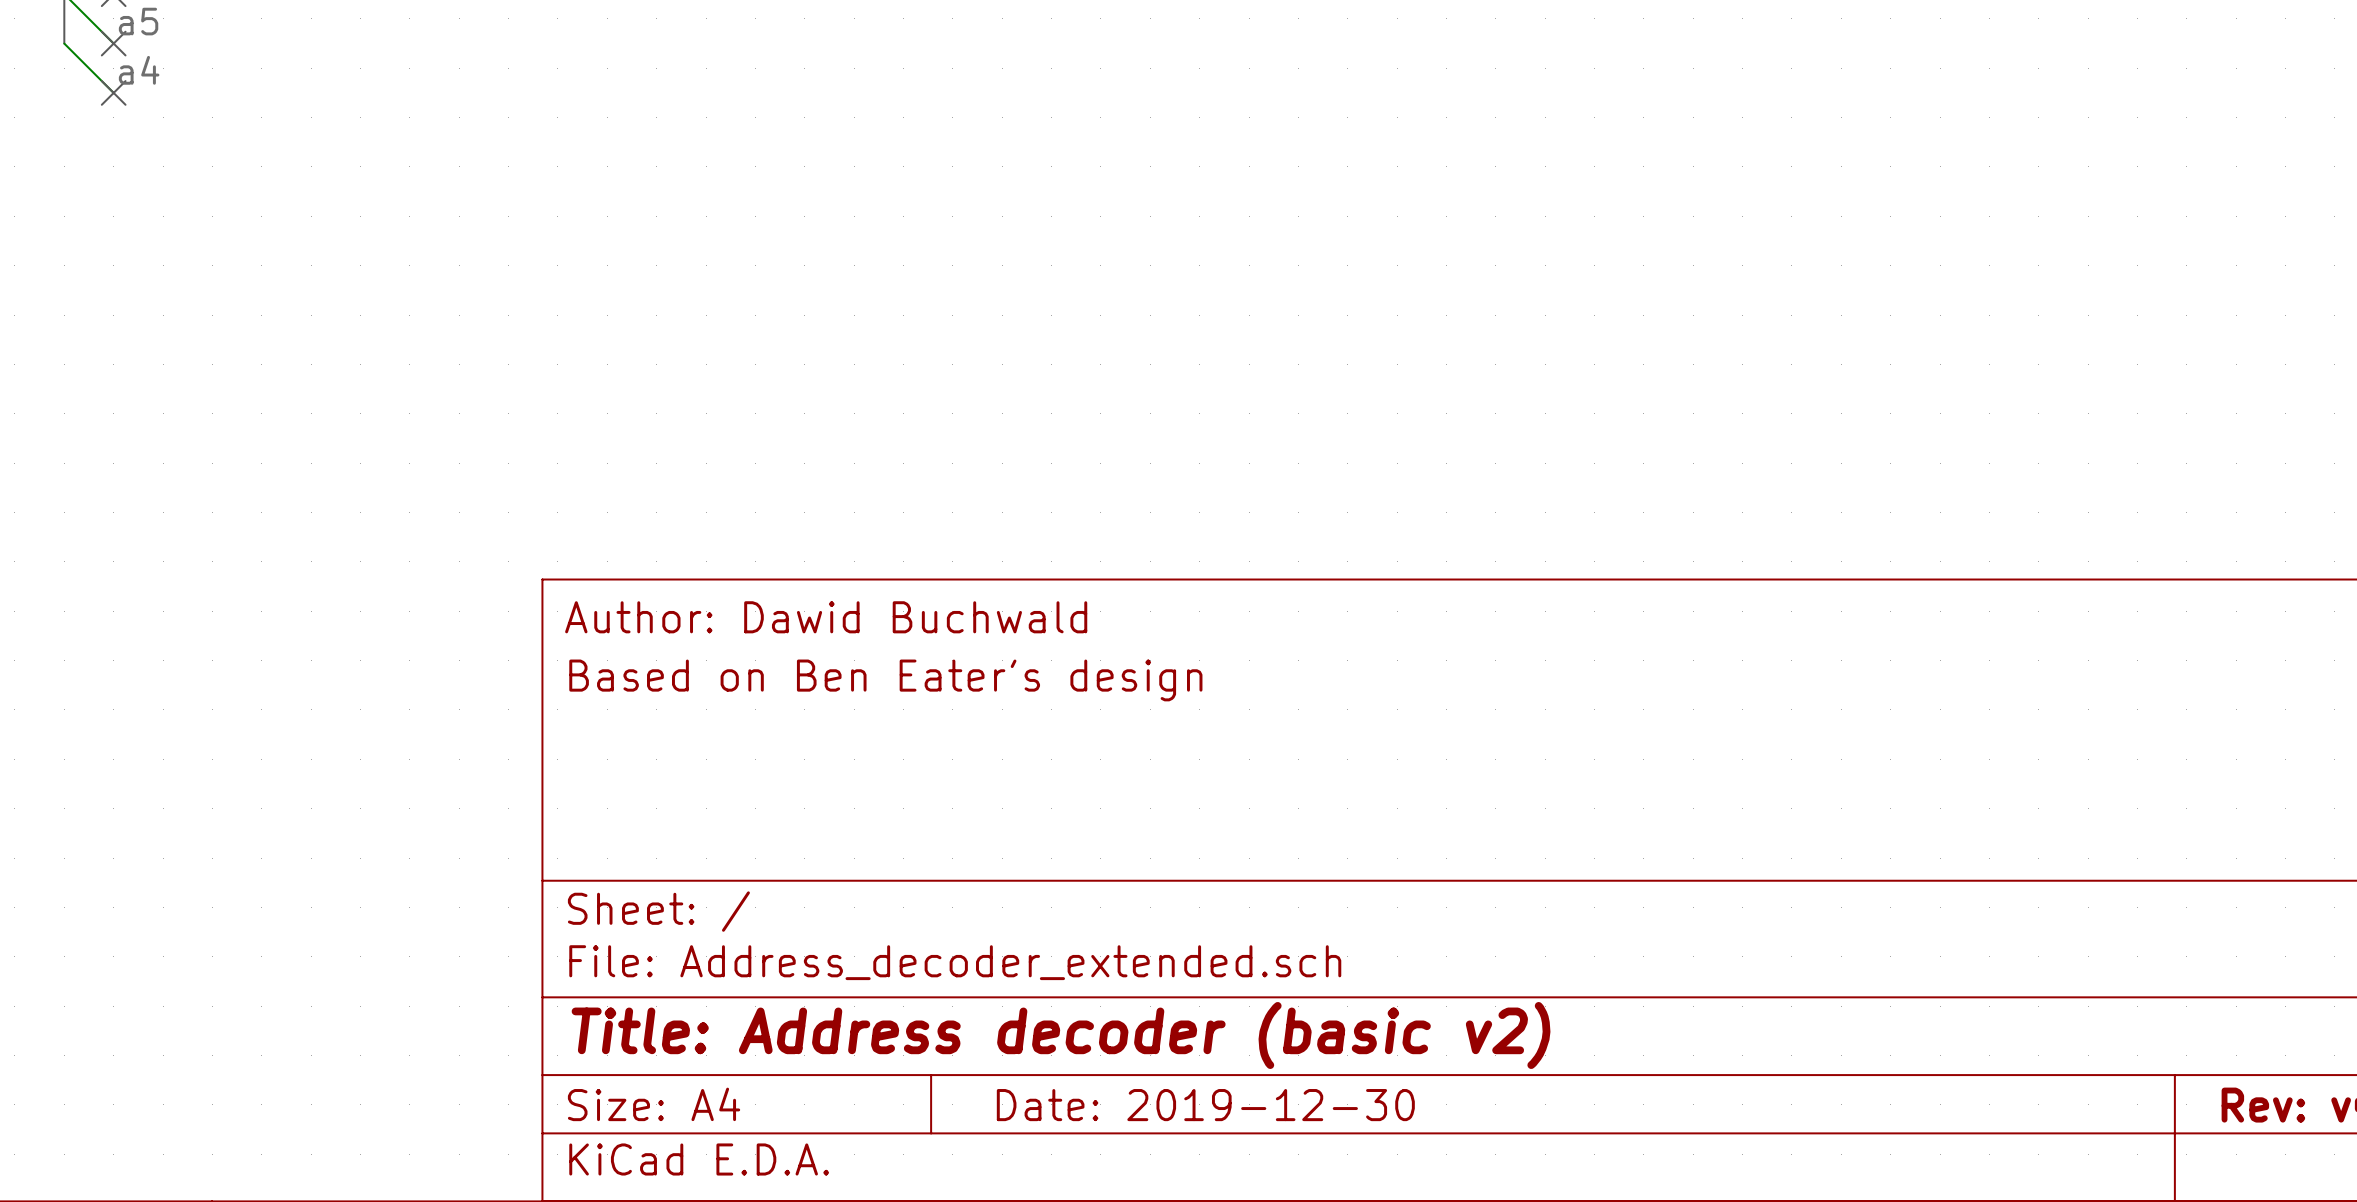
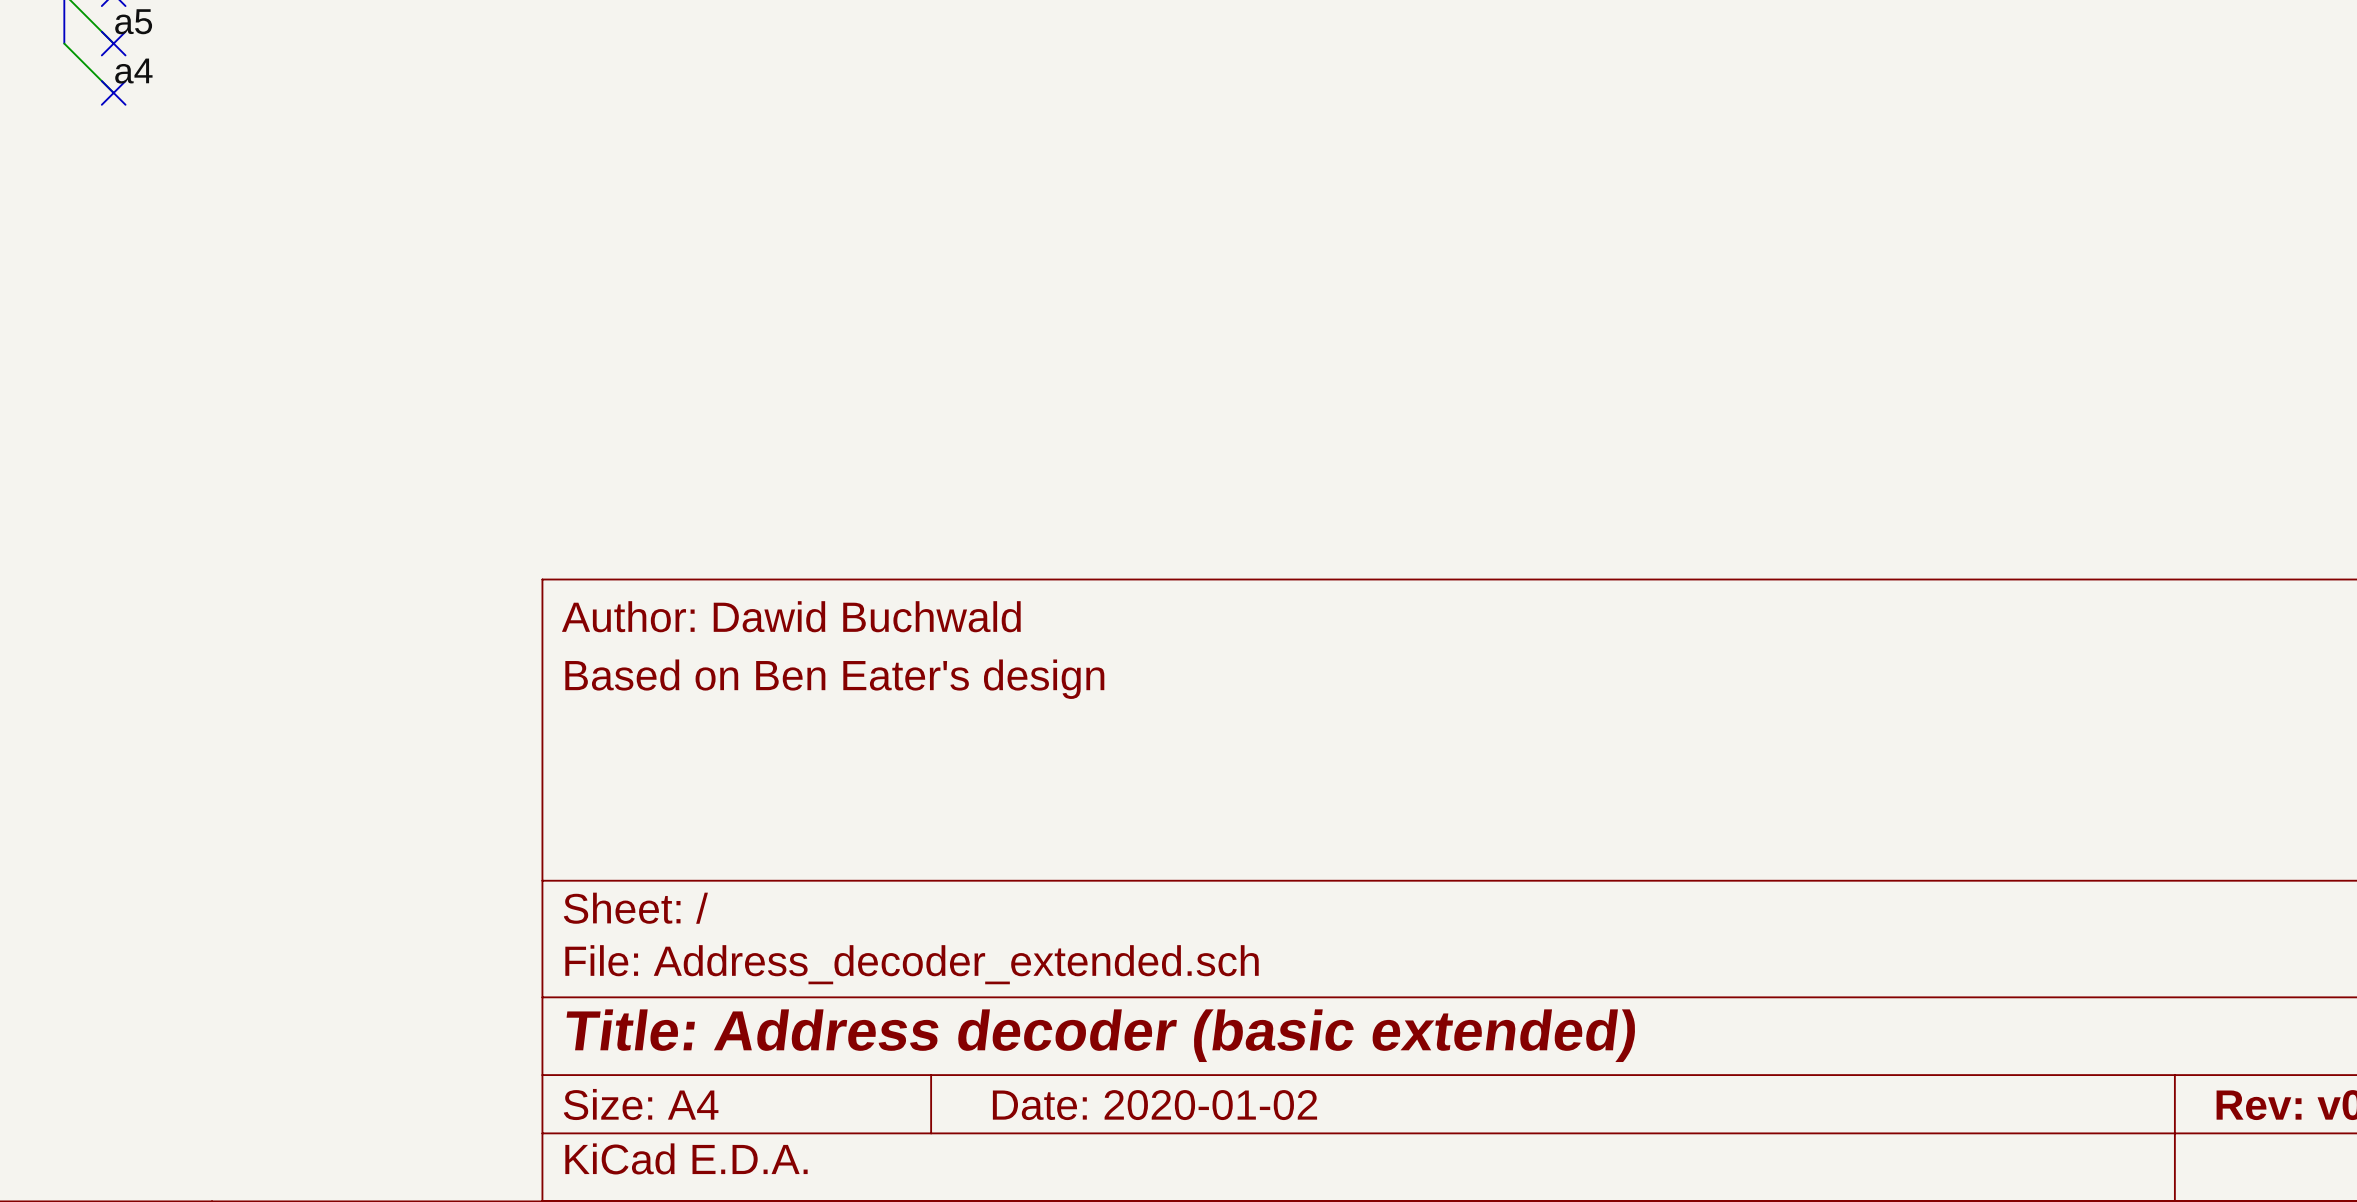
title block: Title: Address decoder (basic v2) (1061, 1035) -> Title: Address decoder (basic extended) (1101, 1035)
title block: Date: 2019-12-30 (1205, 1105) -> Date: 2020-01-02 (1154, 1105)

